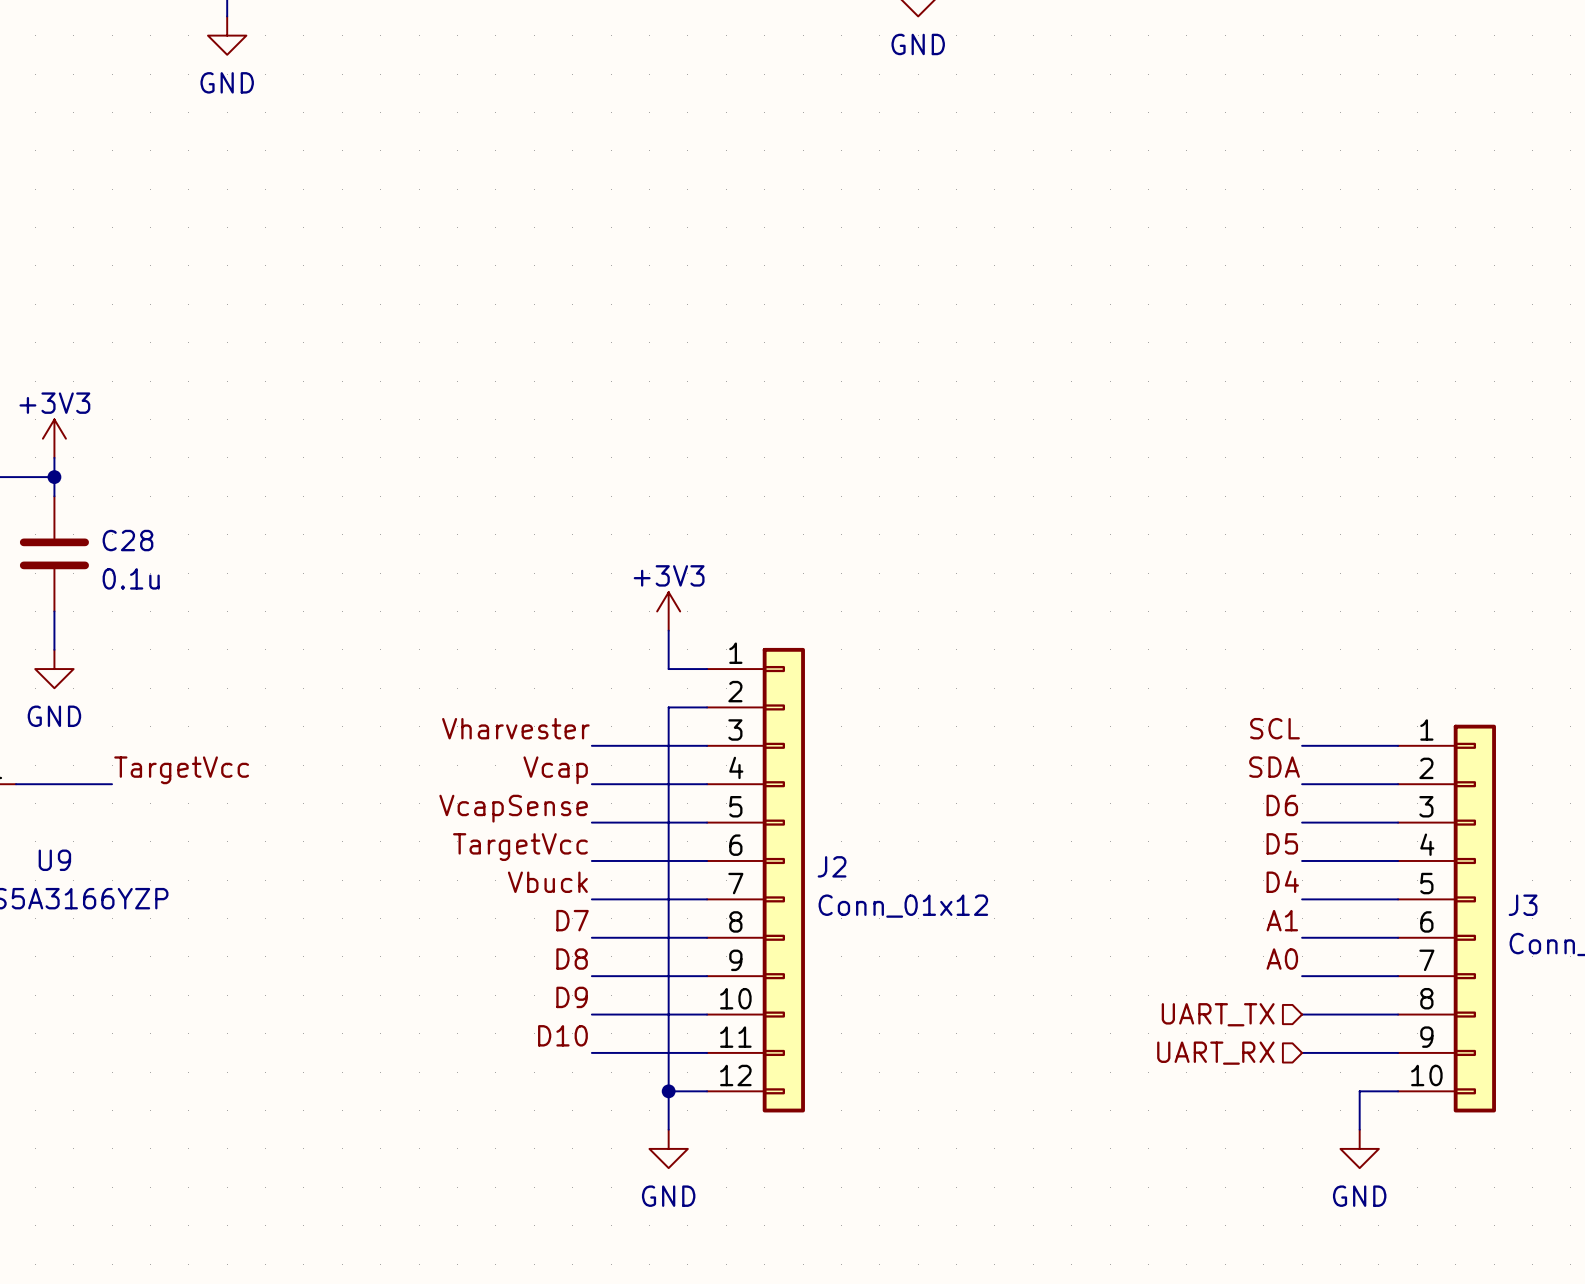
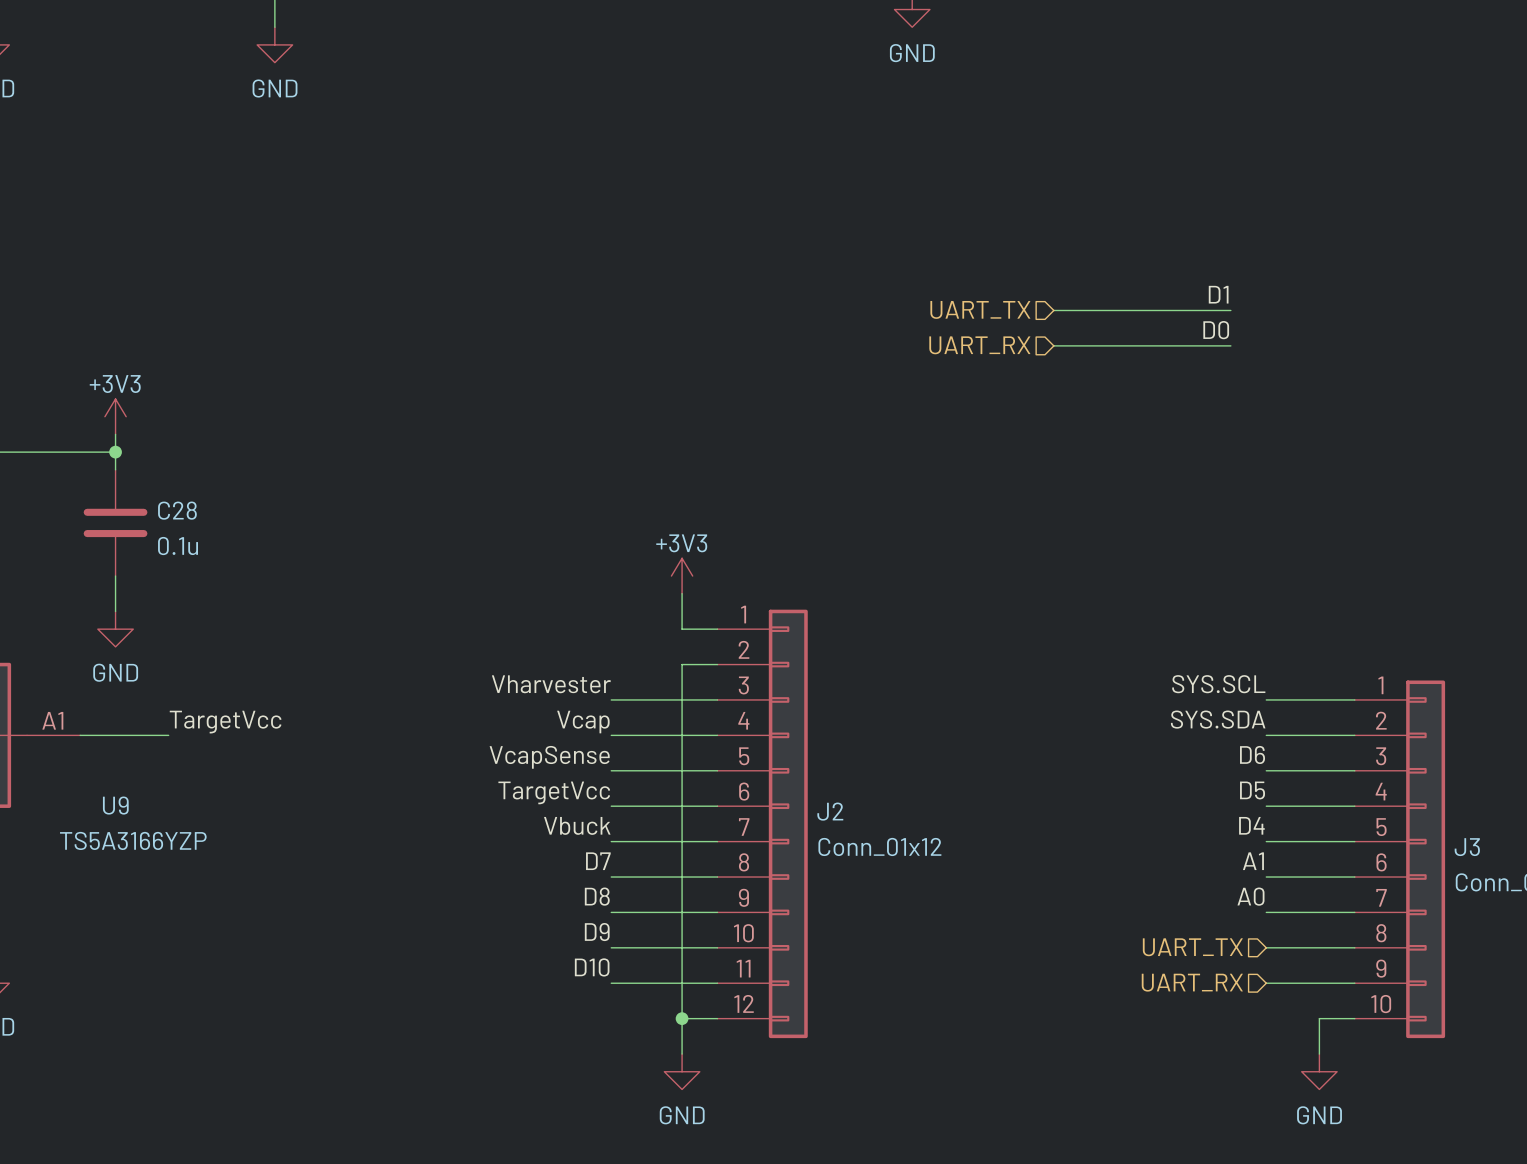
label: none -> D1 (1218, 294)
hierarchical label: none -> UART_TX (980, 309)
wire: none -> (1053, 310) (1230, 310)
label: none -> D0 (1216, 330)
wire: none -> (1053, 345) (1230, 345)
hierarchical label: none -> UART_RX (979, 345)
label: SCL (1274, 728) -> SYS.SCL (1218, 684)
label: SDA (1274, 767) -> SYS.SDA (1218, 719)

